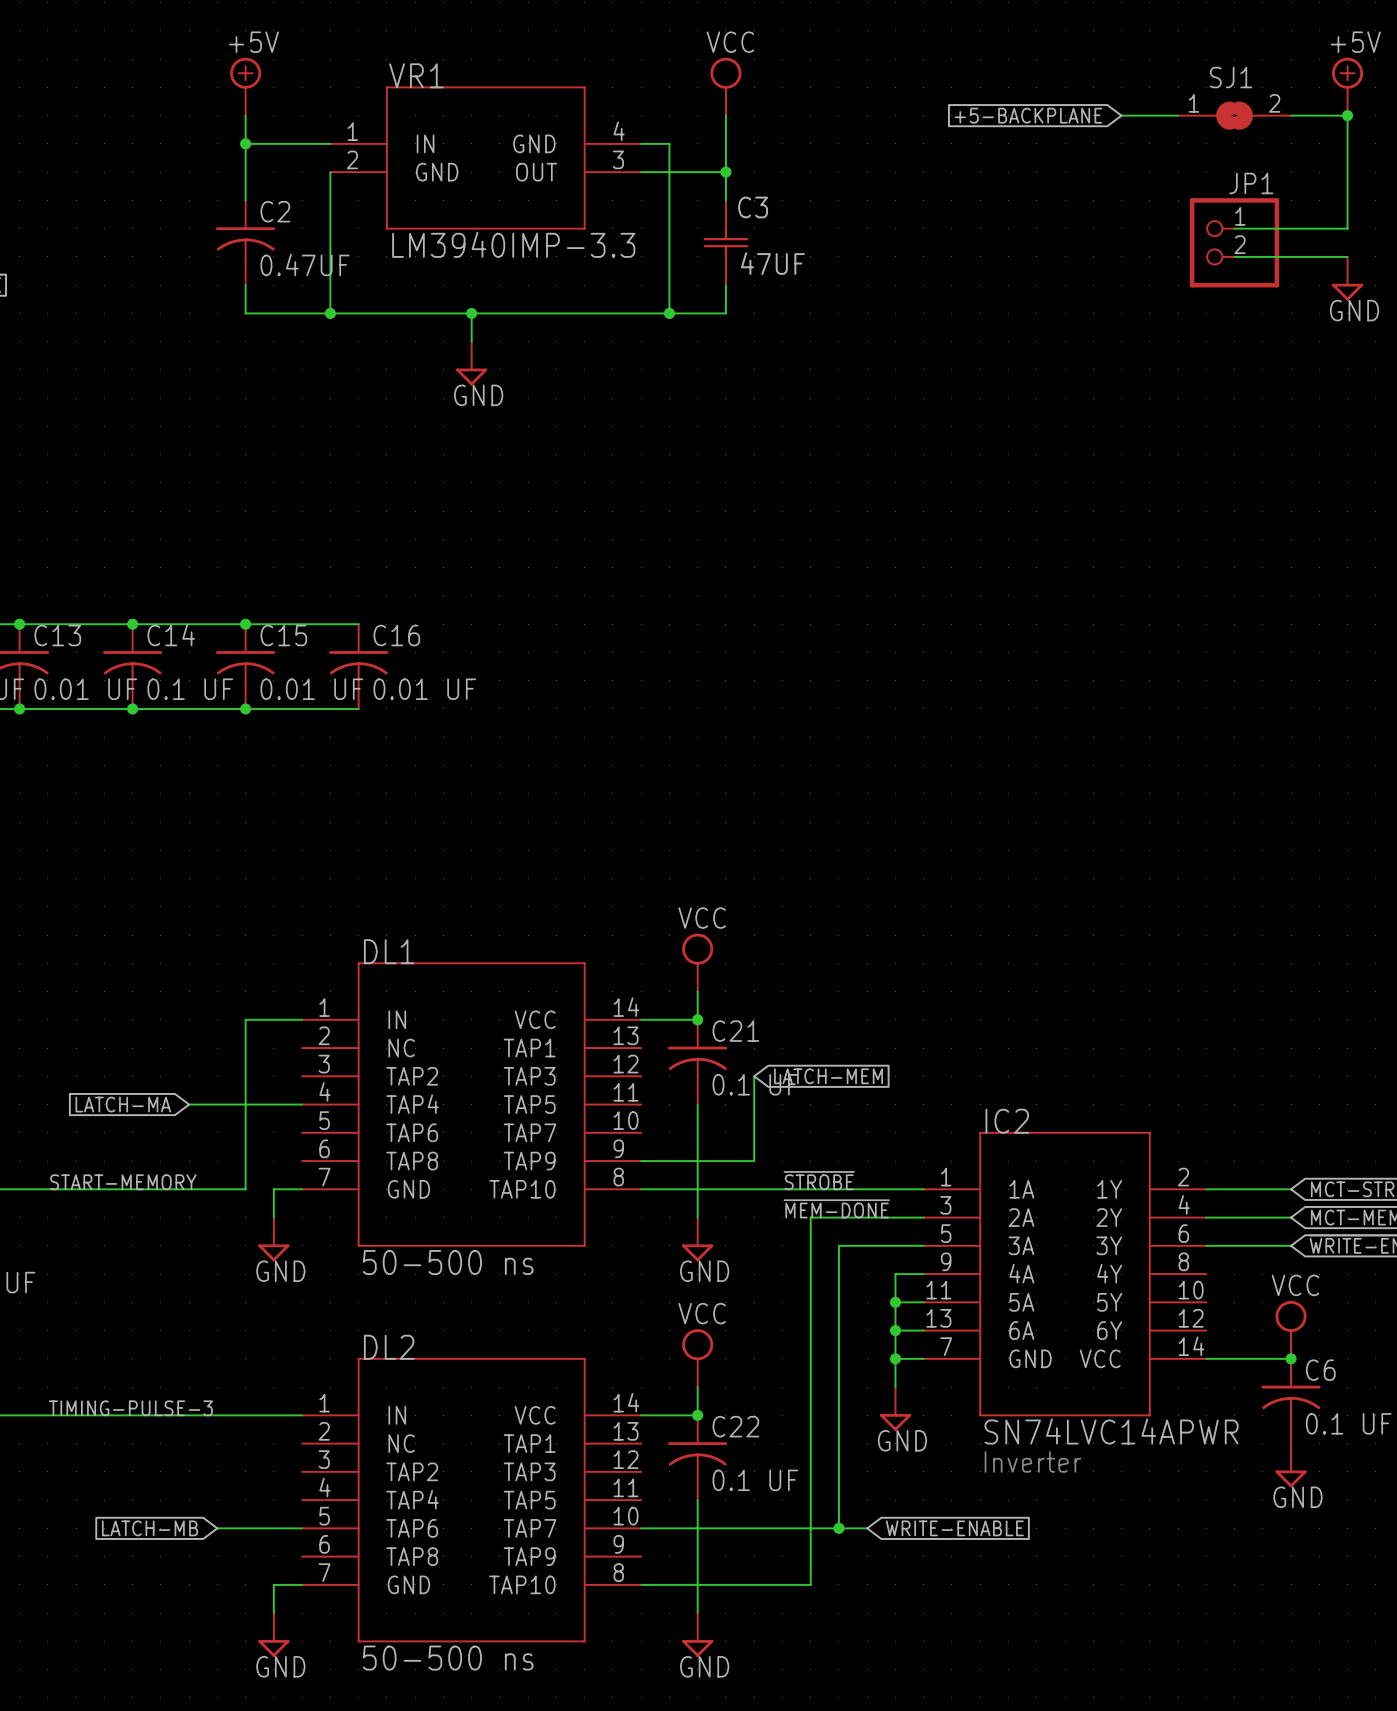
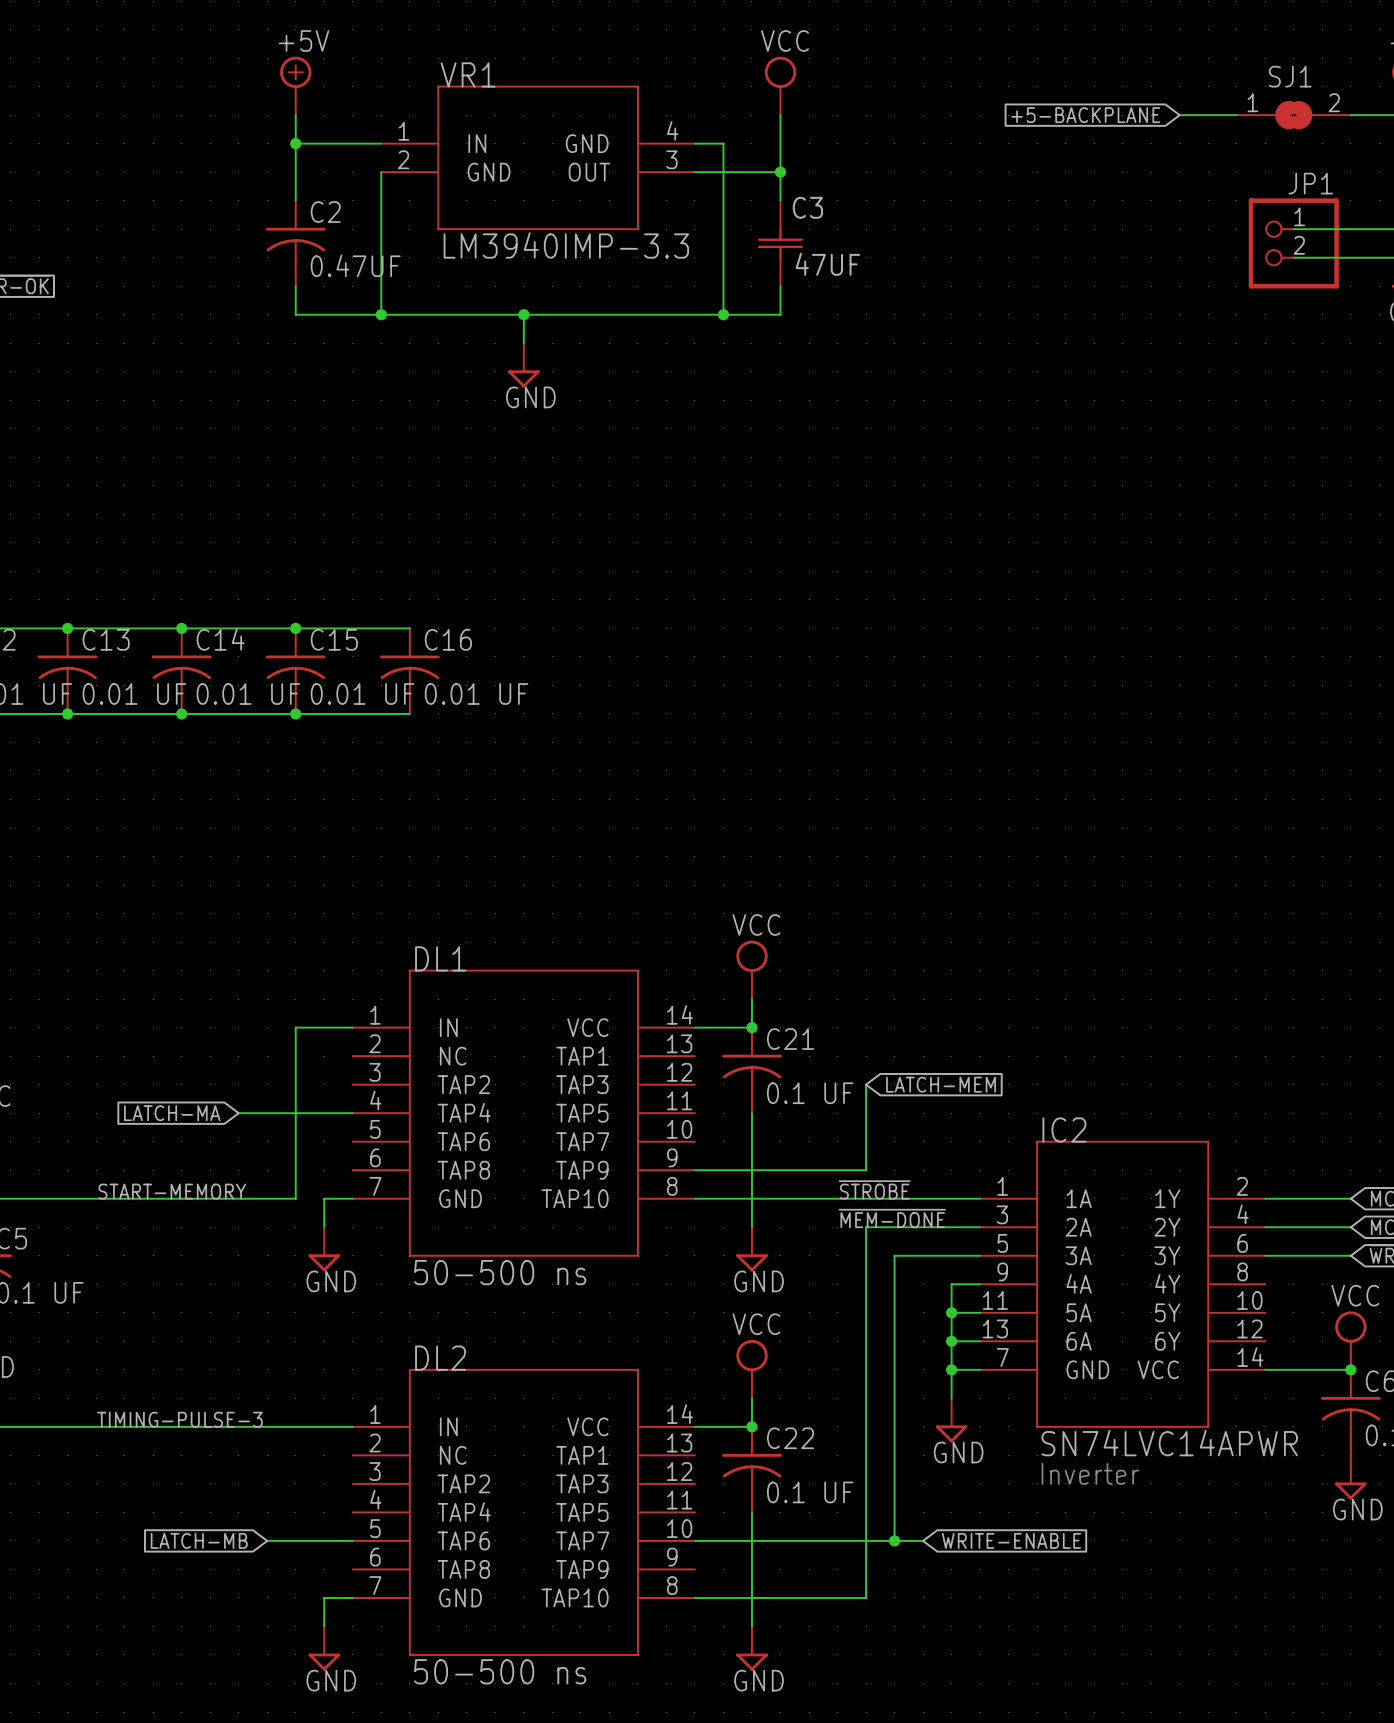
C14 value: 0.1 UF (190, 689) -> 0.01 UF (248, 694)
wire: (754, 1076) (754, 1161) -> (866, 1084) (866, 1170) (809, 1170)
global label position: LATCH-MEM (828, 1076) -> LATCH-MEM (941, 1084)

